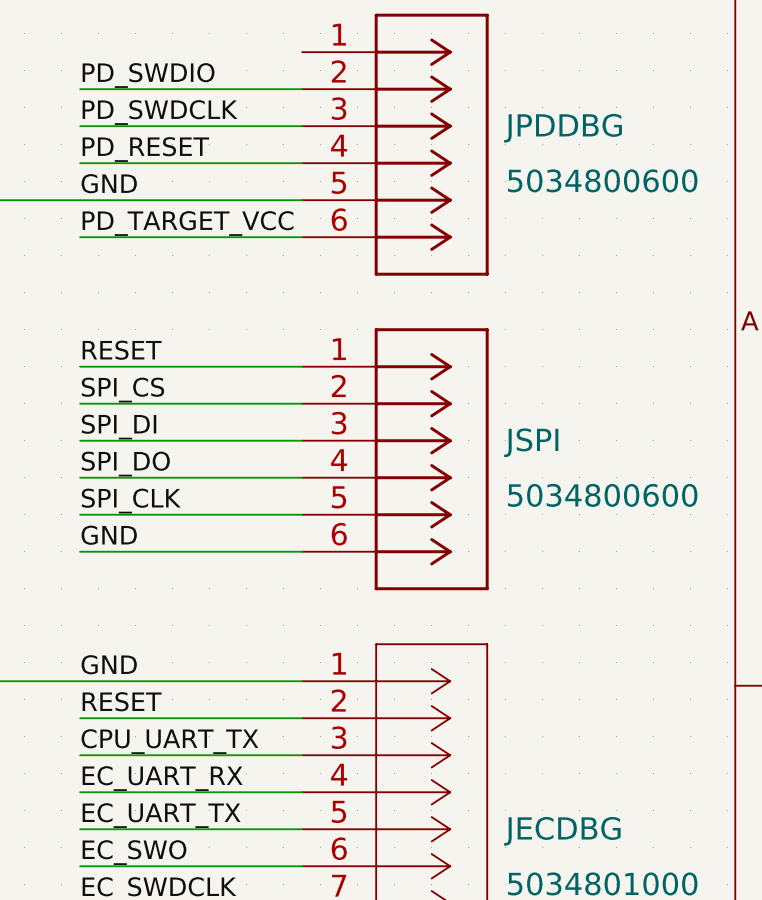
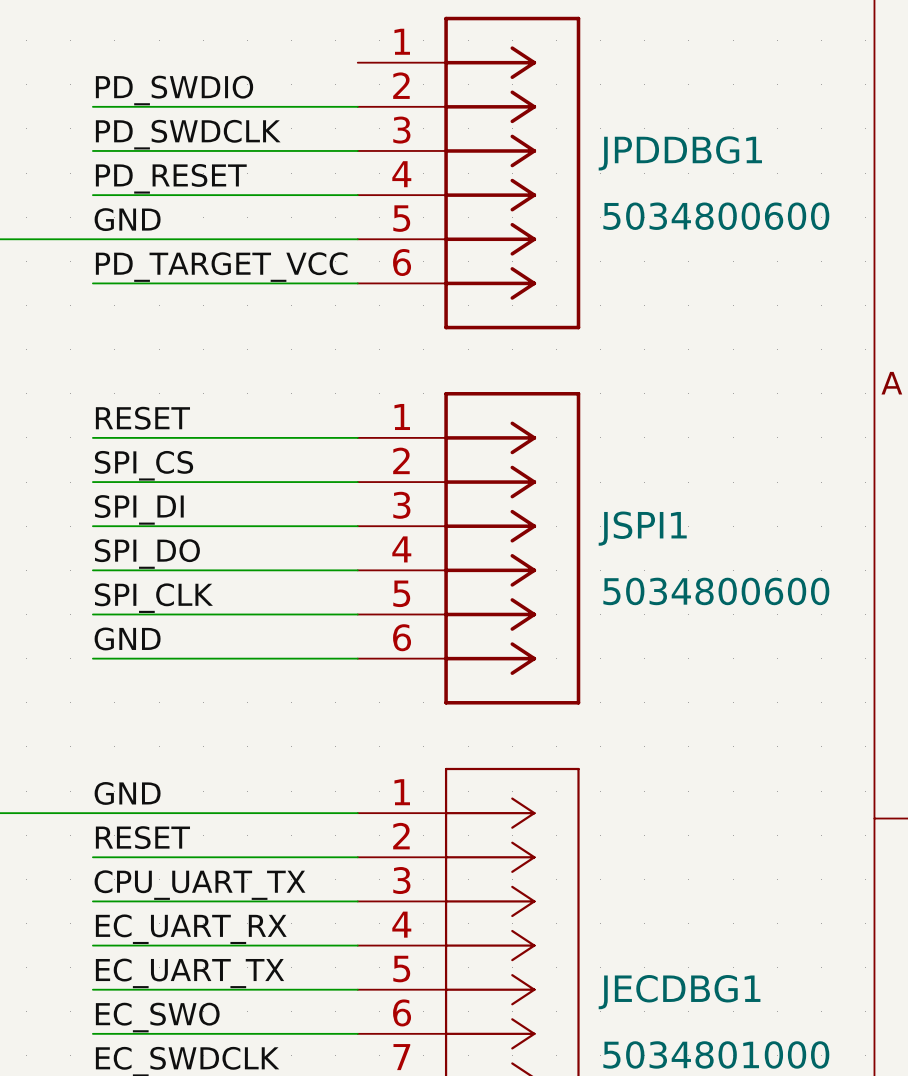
JPDDBG name: JPDDBG (563, 128) -> JPDDBG1 (680, 153)
JSPI name: JSPI (531, 442) -> JSPI1 (642, 528)
JECDBG name: JECDBG (562, 831) -> JECDBG1 (679, 992)

